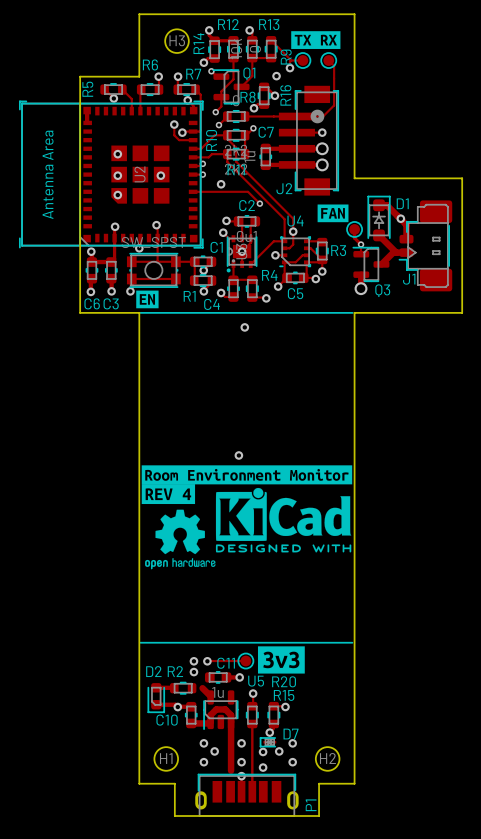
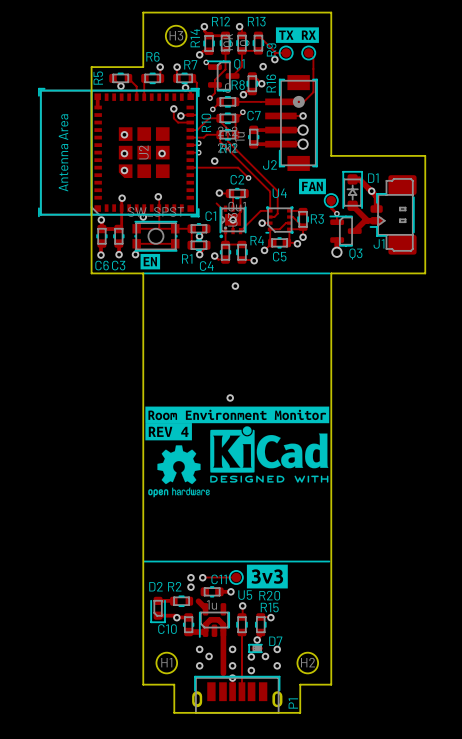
via: (293, 231) -> none
via: (223, 232) -> none

